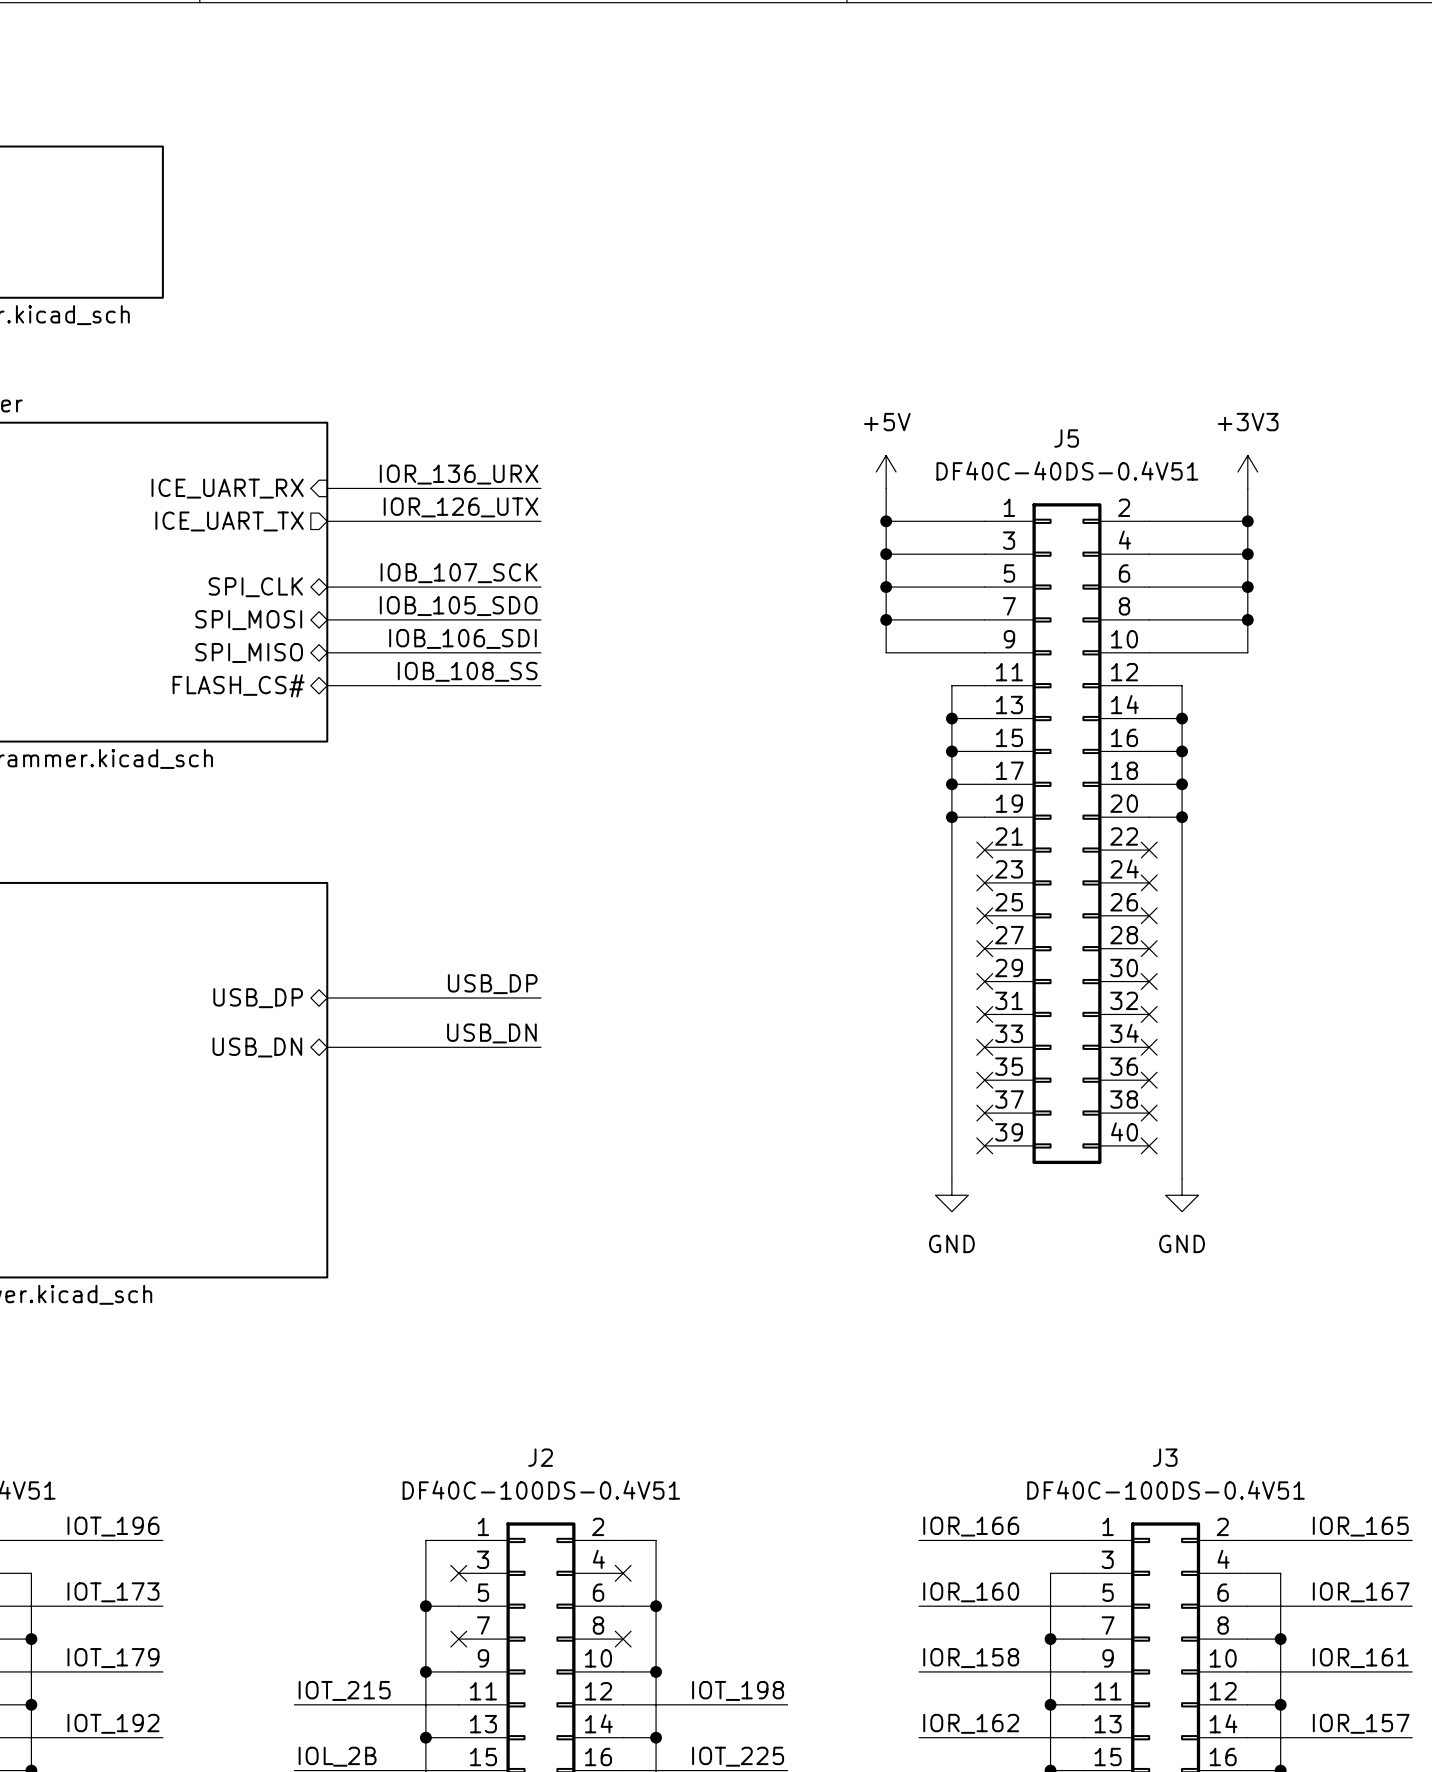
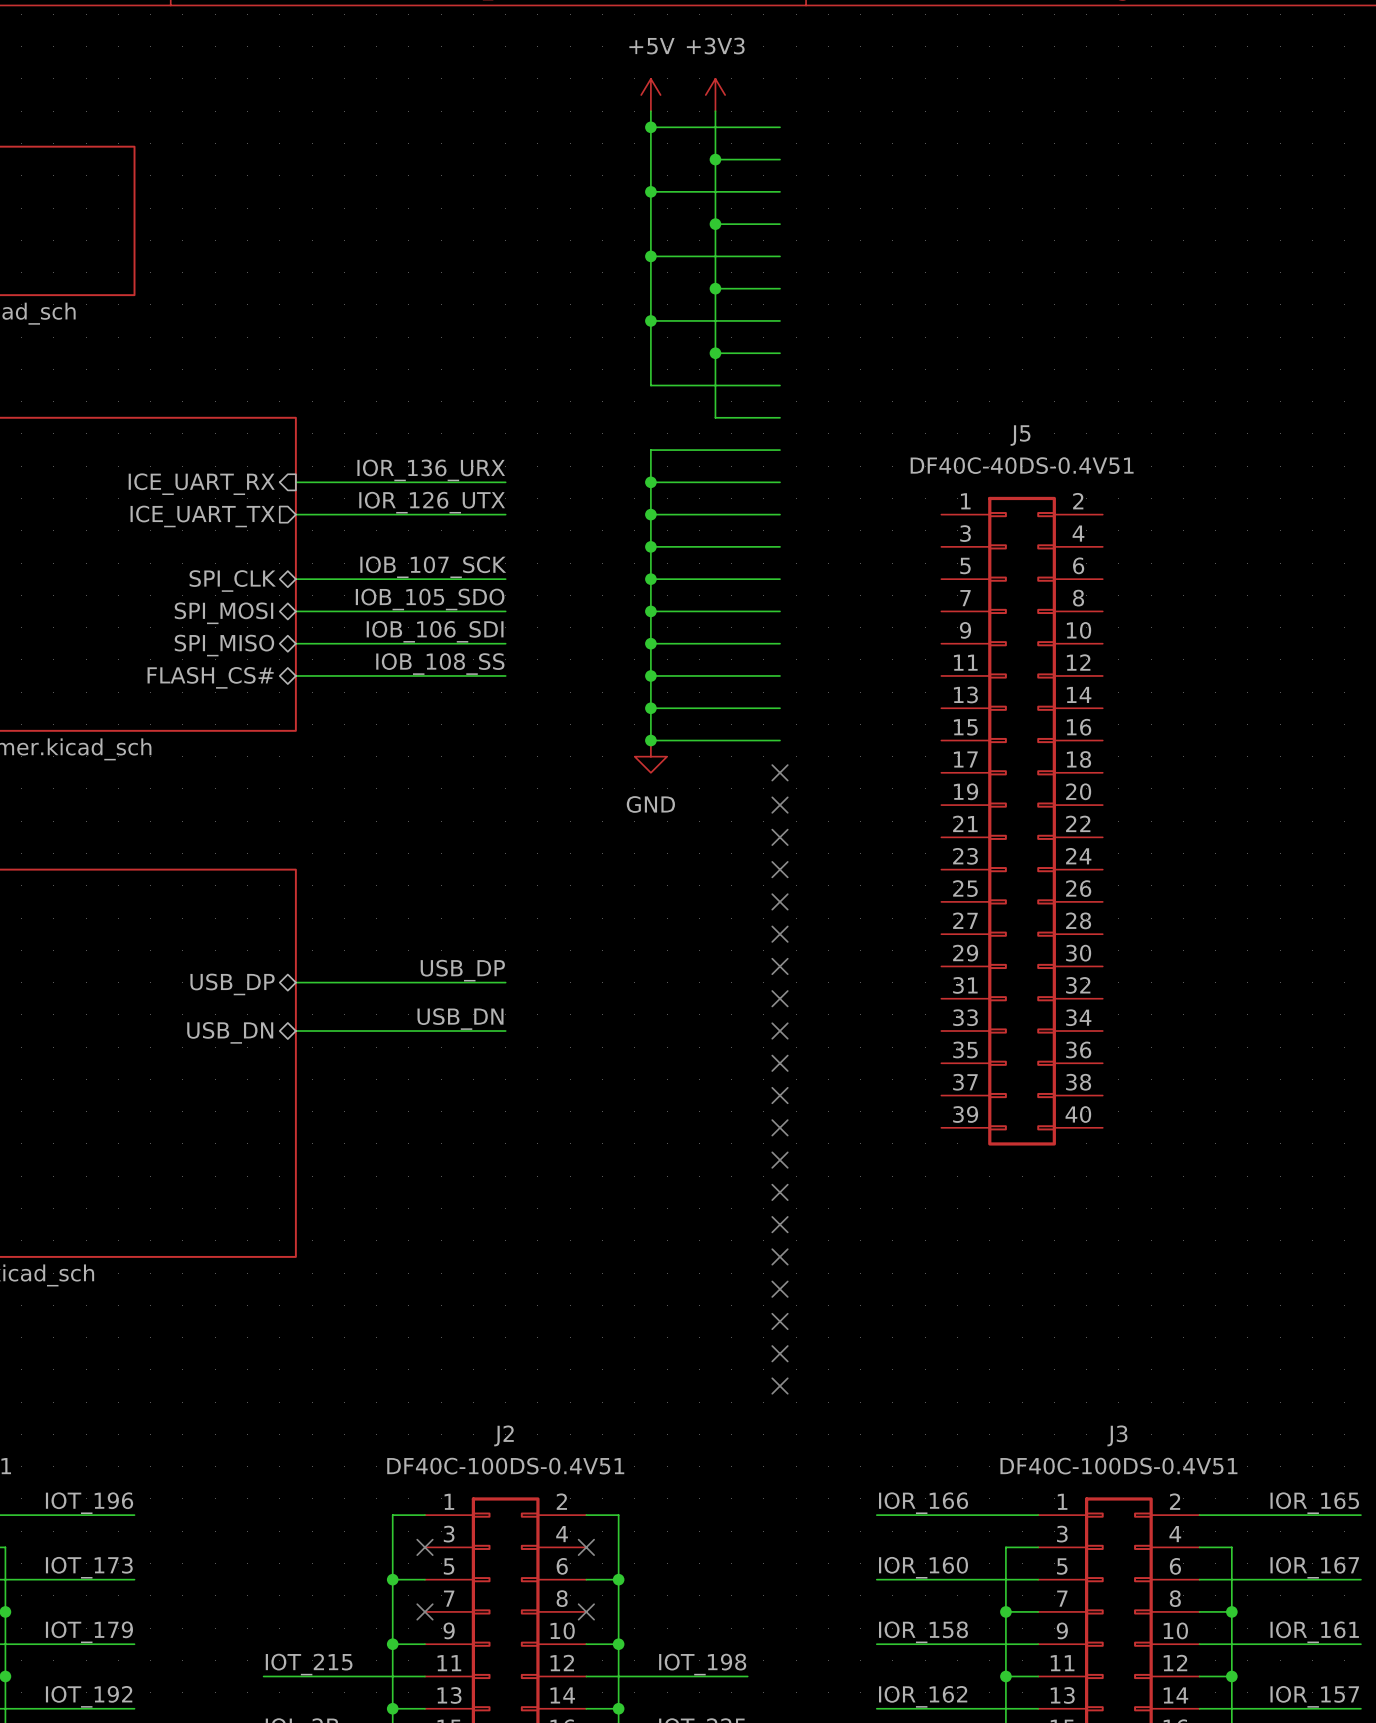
power symbol: none -> +5V (650, 95)
power symbol: none -> +3V3 (715, 95)
wire: none -> (650, 111) (650, 385) (780, 385)
wire: none -> (715, 111) (715, 417) (780, 417)
wire: none -> (650, 127) (780, 127)
junction: none -> (650, 127)
wire: none -> (715, 159) (780, 159)
junction: none -> (715, 159)
wire: none -> (650, 191) (780, 191)
junction: none -> (650, 191)
wire: none -> (715, 224) (780, 224)
junction: none -> (715, 224)
wire: none -> (650, 256) (780, 256)
junction: none -> (650, 256)
wire: none -> (715, 288) (780, 288)
junction: none -> (715, 288)
wire: none -> (650, 320) (780, 320)
junction: none -> (650, 320)
wire: none -> (715, 353) (780, 353)
junction: none -> (715, 353)
wire: none -> (780, 450) (650, 450) (650, 740) (780, 740)
power symbol: +5V (886, 471) -> none
power symbol: +3V3 (1247, 471) -> none
wire: none -> (650, 482) (780, 482)
junction: none -> (650, 482)
wire: (886, 488) (886, 652) (984, 652) -> none
wire: (1247, 488) (1247, 652) (1149, 652) -> none
wire: none -> (650, 514) (780, 514)
junction: none -> (650, 514)
wire: (886, 521) (984, 521) -> none
junction: (886, 521) -> none
wire: (1149, 521) (1247, 521) -> none
junction: (1247, 521) -> none
wire: none -> (650, 546) (780, 546)
junction: none -> (650, 546)
wire: (886, 554) (984, 554) -> none
junction: (886, 554) -> none
wire: (1149, 554) (1247, 554) -> none
junction: (1247, 554) -> none
wire: none -> (650, 579) (780, 579)
junction: none -> (650, 579)
wire: (886, 587) (984, 587) -> none
junction: (886, 587) -> none
wire: (1149, 587) (1247, 587) -> none
junction: (1247, 587) -> none
wire: none -> (650, 611) (780, 611)
junction: none -> (650, 611)
wire: (886, 619) (984, 619) -> none
junction: (886, 619) -> none
wire: (1149, 619) (1247, 619) -> none
junction: (1247, 619) -> none
wire: none -> (650, 643) (780, 643)
junction: none -> (650, 643)
wire: none -> (650, 675) (780, 675)
junction: none -> (650, 675)
wire: (984, 685) (951, 685) (951, 1178) -> none
wire: (1149, 685) (1182, 685) (1182, 1178) -> none
wire: none -> (650, 708) (780, 708)
junction: none -> (650, 708)
wire: (951, 718) (984, 718) -> none
junction: (951, 718) -> none
wire: (1149, 718) (1182, 718) -> none
junction: (1182, 718) -> none
junction: none -> (650, 740)
wire: (951, 751) (984, 751) -> none
junction: (951, 751) -> none
wire: (1149, 751) (1182, 751) -> none
junction: (1182, 751) -> none
power symbol: none -> GND (650, 756)
no-connect mark: none -> (780, 772)
wire: (951, 784) (984, 784) -> none
junction: (951, 784) -> none
wire: (1149, 784) (1182, 784) -> none
junction: (1182, 784) -> none
no-connect mark: none -> (780, 805)
wire: (951, 817) (984, 817) -> none
junction: (951, 817) -> none
wire: (1149, 817) (1182, 817) -> none
junction: (1182, 817) -> none
no-connect mark: none -> (780, 837)
no-connect mark: (984, 850) -> none
no-connect mark: (1149, 850) -> none
no-connect mark: none -> (780, 869)
no-connect mark: (984, 882) -> none
no-connect mark: (1149, 882) -> none
no-connect mark: none -> (780, 901)
no-connect mark: (984, 915) -> none
no-connect mark: (1149, 915) -> none
no-connect mark: none -> (780, 934)
no-connect mark: (984, 948) -> none
no-connect mark: (1149, 948) -> none
no-connect mark: none -> (780, 966)
no-connect mark: (984, 981) -> none
no-connect mark: (1149, 981) -> none
no-connect mark: none -> (780, 998)
no-connect mark: (984, 1014) -> none
no-connect mark: (1149, 1014) -> none
no-connect mark: none -> (780, 1031)
no-connect mark: (984, 1047) -> none
no-connect mark: (1149, 1047) -> none
no-connect mark: none -> (780, 1063)
no-connect mark: (984, 1080) -> none
no-connect mark: (1149, 1080) -> none
no-connect mark: none -> (780, 1095)
no-connect mark: (984, 1113) -> none
no-connect mark: (1149, 1113) -> none
no-connect mark: none -> (780, 1127)
no-connect mark: (984, 1145) -> none
no-connect mark: (1149, 1145) -> none
no-connect mark: none -> (780, 1160)
power symbol: GND (951, 1195) -> none
power symbol: GND (1182, 1195) -> none
no-connect mark: none -> (780, 1192)
no-connect mark: none -> (780, 1224)
no-connect mark: none -> (780, 1256)
no-connect mark: none -> (780, 1289)
no-connect mark: none -> (780, 1321)
no-connect mark: none -> (780, 1353)
no-connect mark: none -> (780, 1386)

